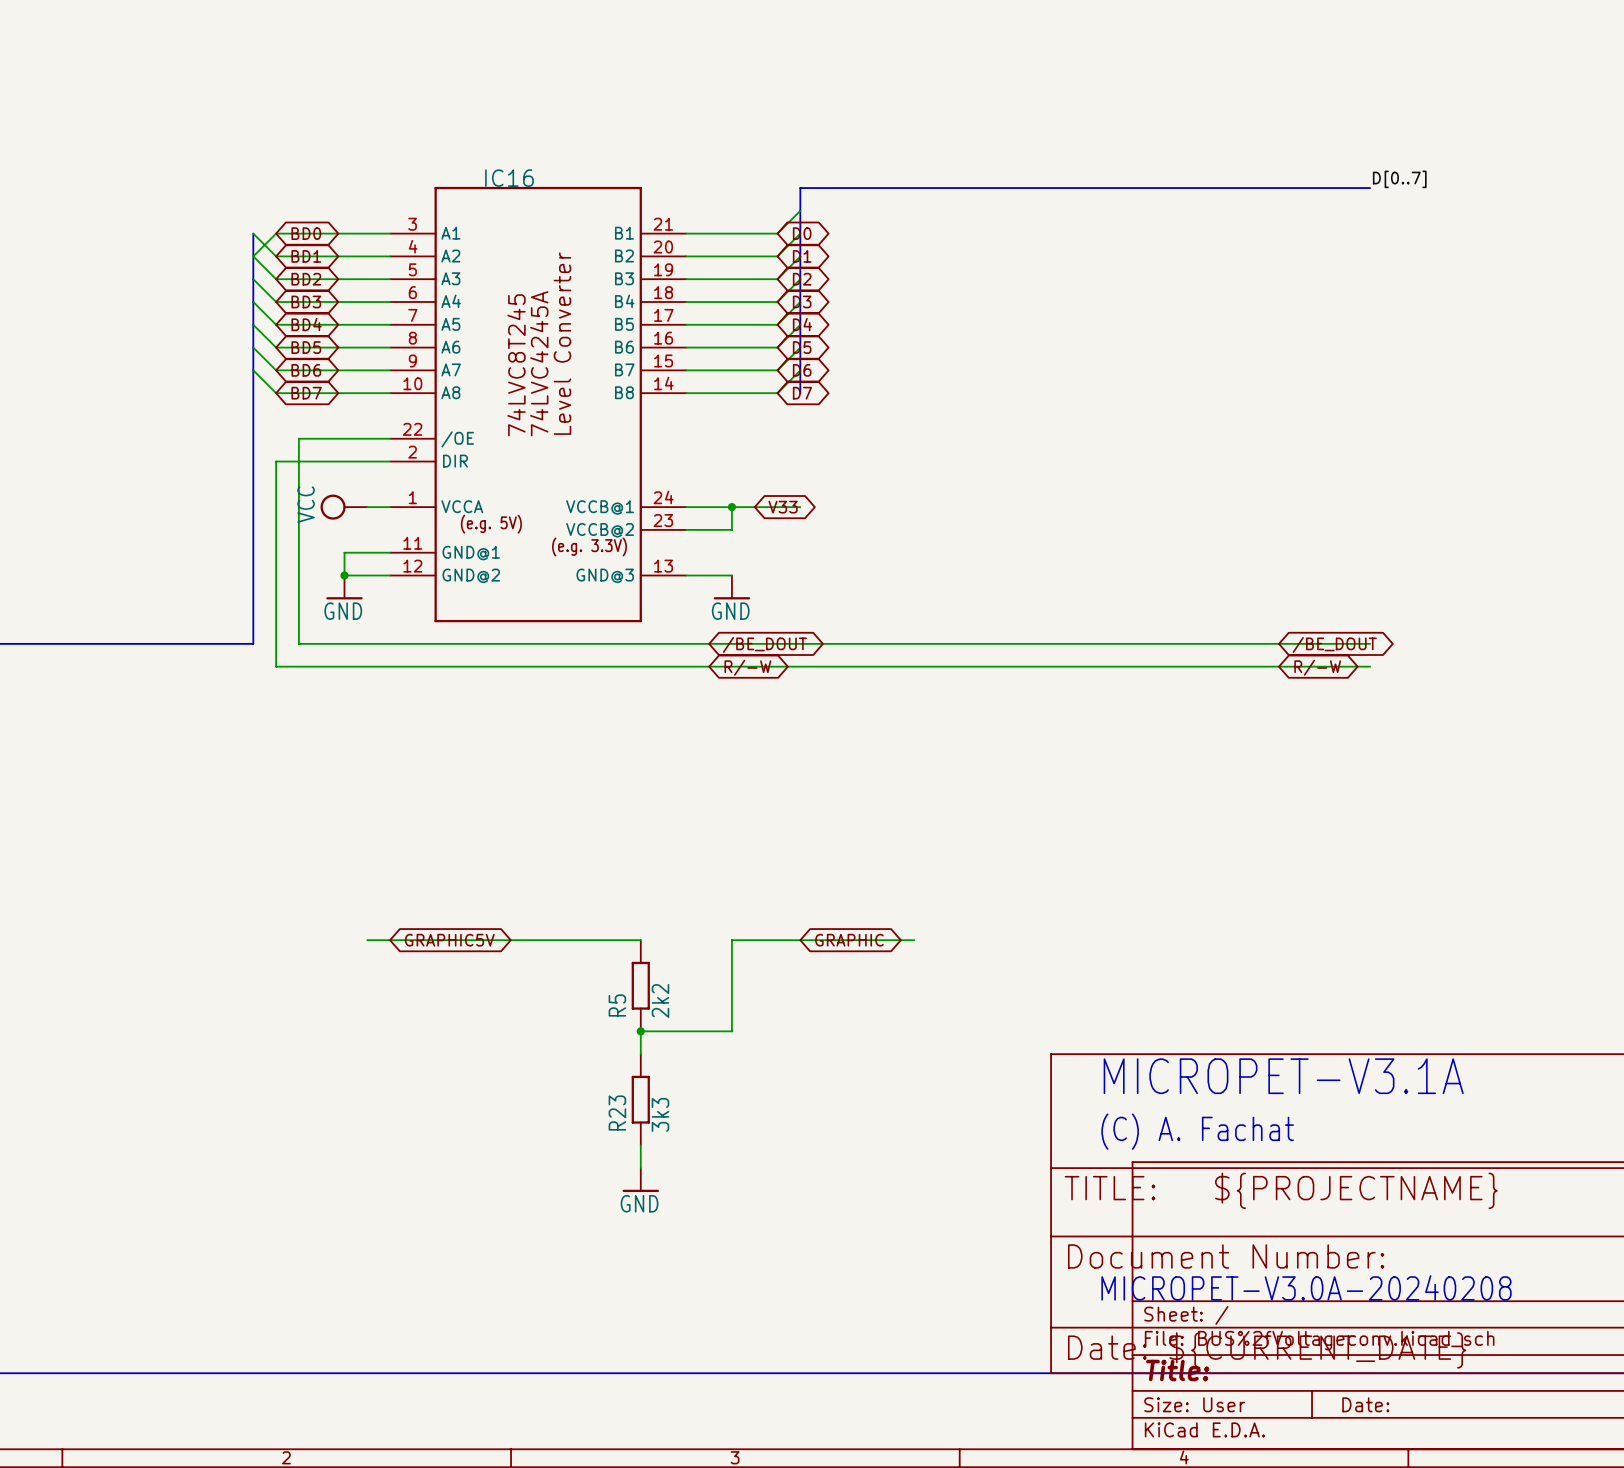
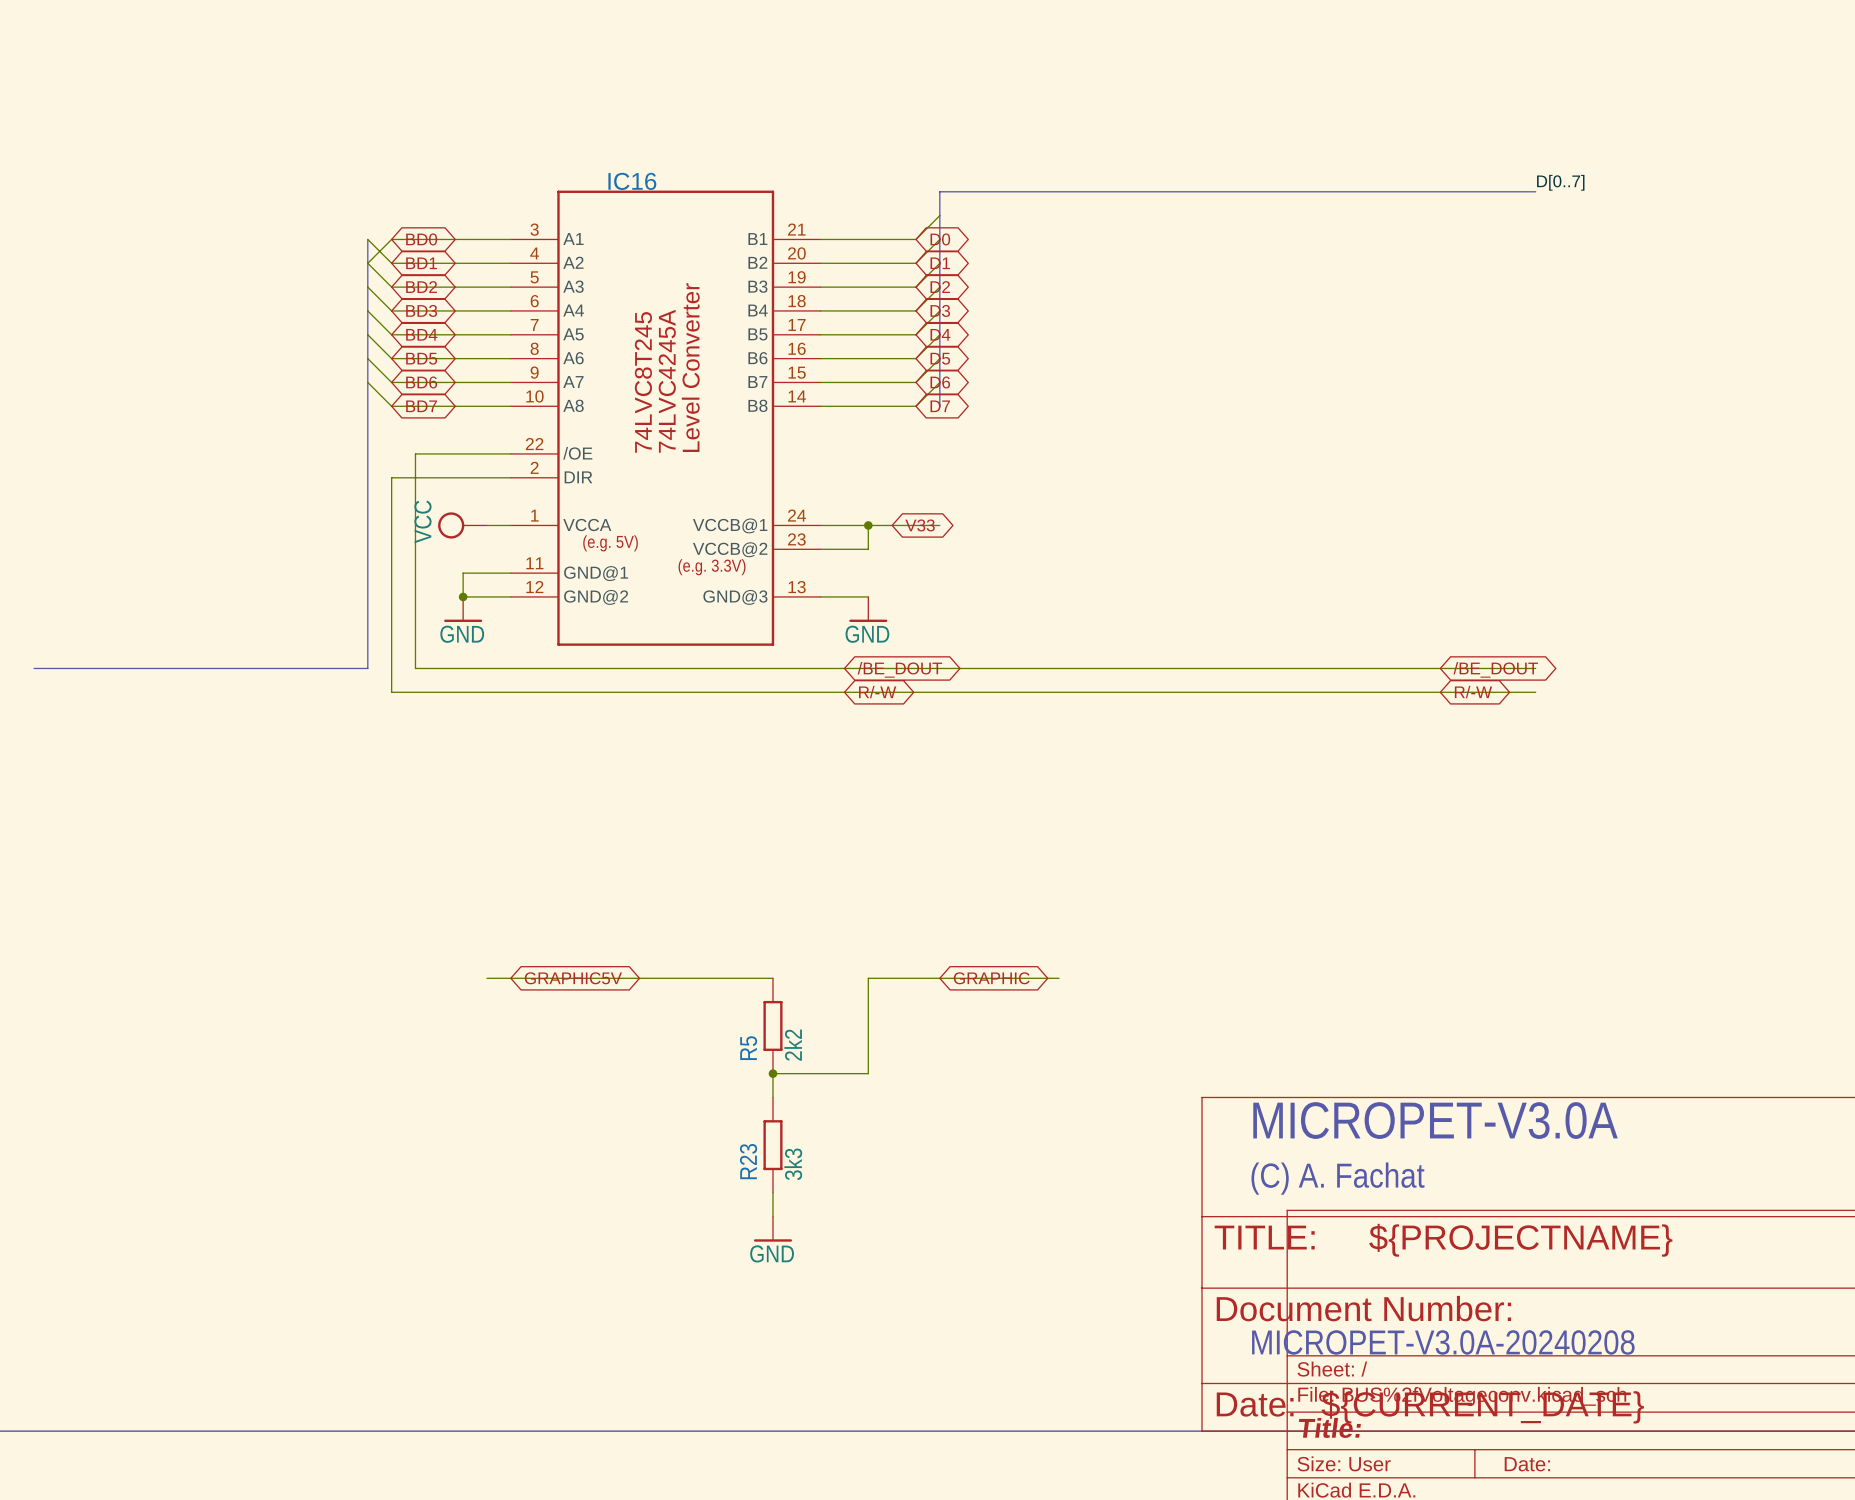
text: MICROPET-V3.1A (1283, 1076) -> MICROPET-V3.0A (1435, 1120)

